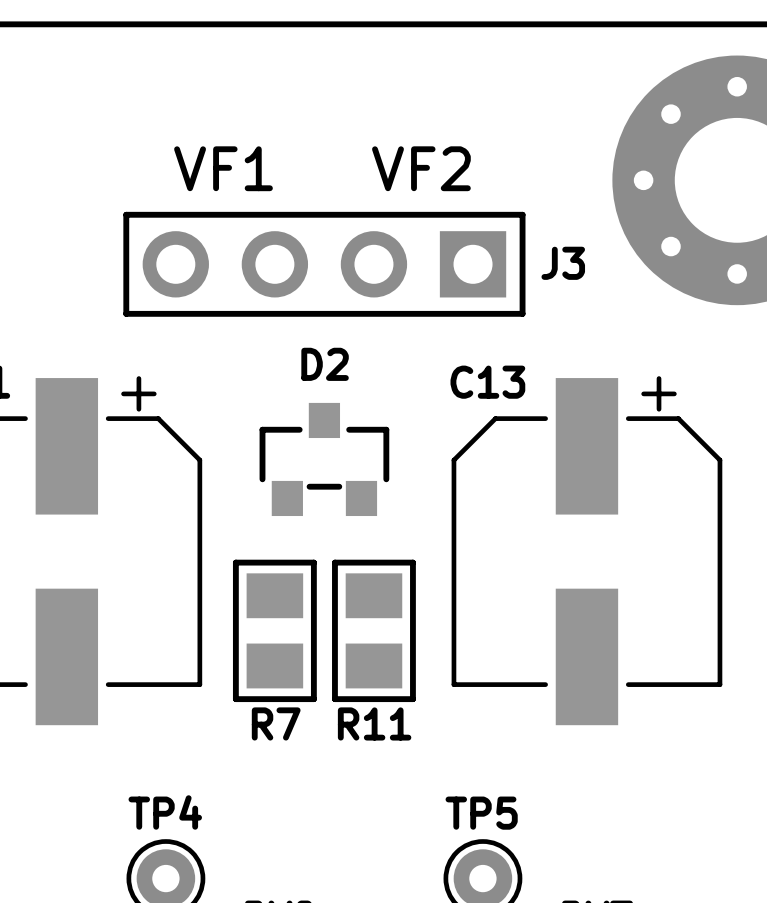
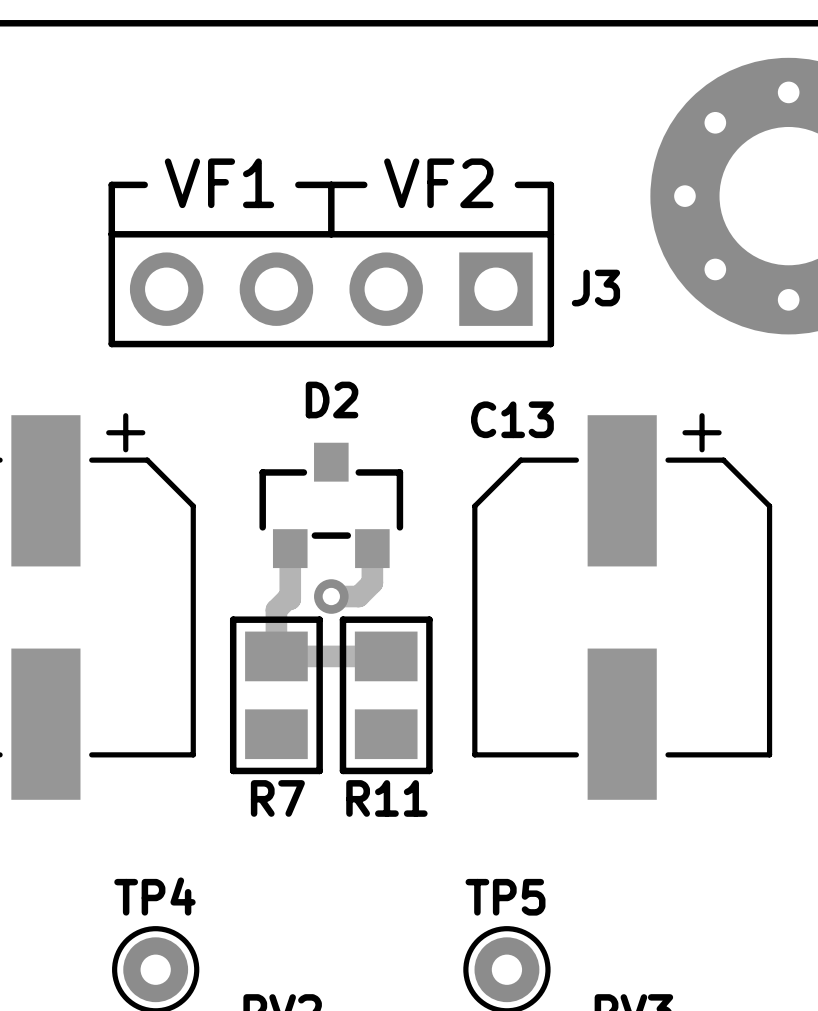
line: none -> (144, 184) (111, 184) (111, 234)
line: none -> (298, 184) (364, 184)
line: none -> (331, 184) (331, 234)
line: none -> (517, 184) (550, 184) (550, 234)
track: none -> (290, 548) (290, 599) (287, 599) (276, 609) (276, 656) (386, 656)
track: none -> (372, 548) (372, 582) (358, 596) (331, 596)
via: none -> (331, 596)

